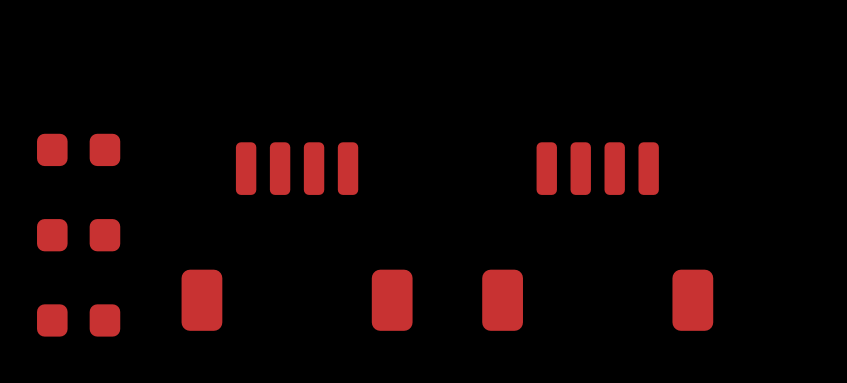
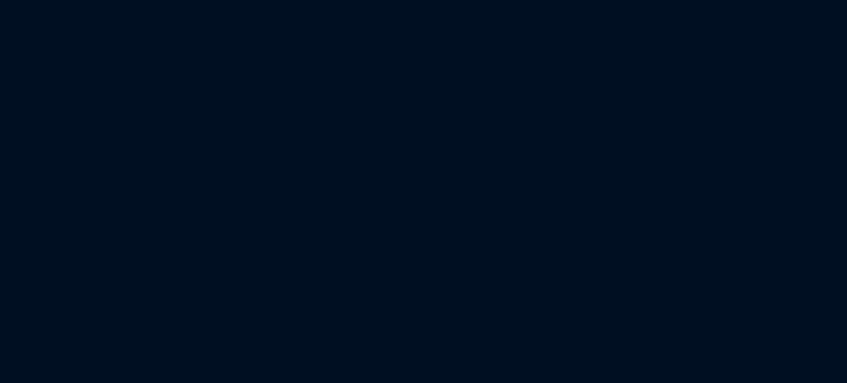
part: (78, 149) -> none
part: (78, 235) -> none
part: (297, 236) -> none
part: (597, 236) -> none
part: (78, 320) -> none

